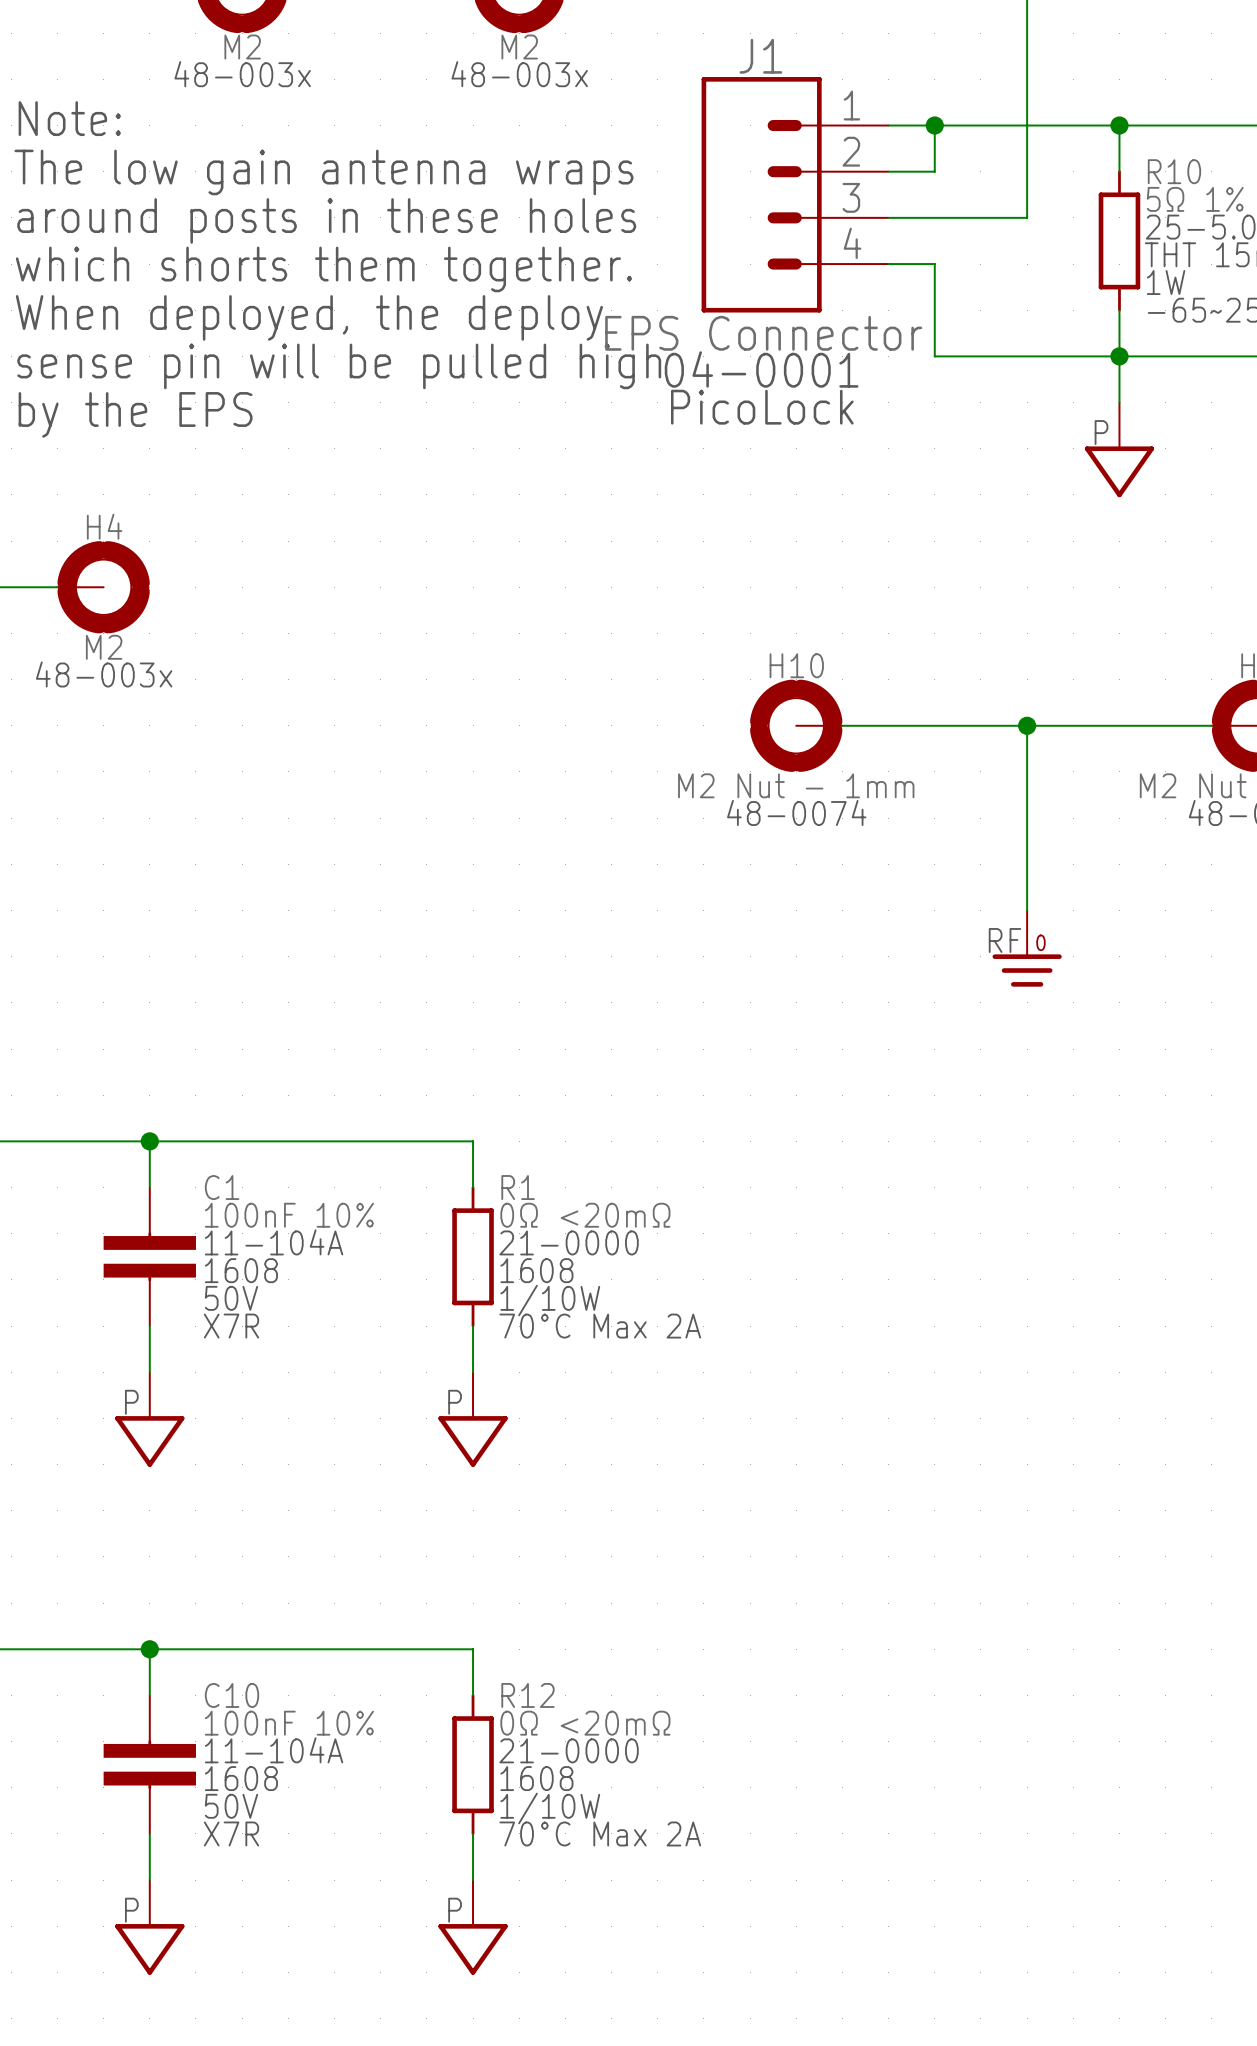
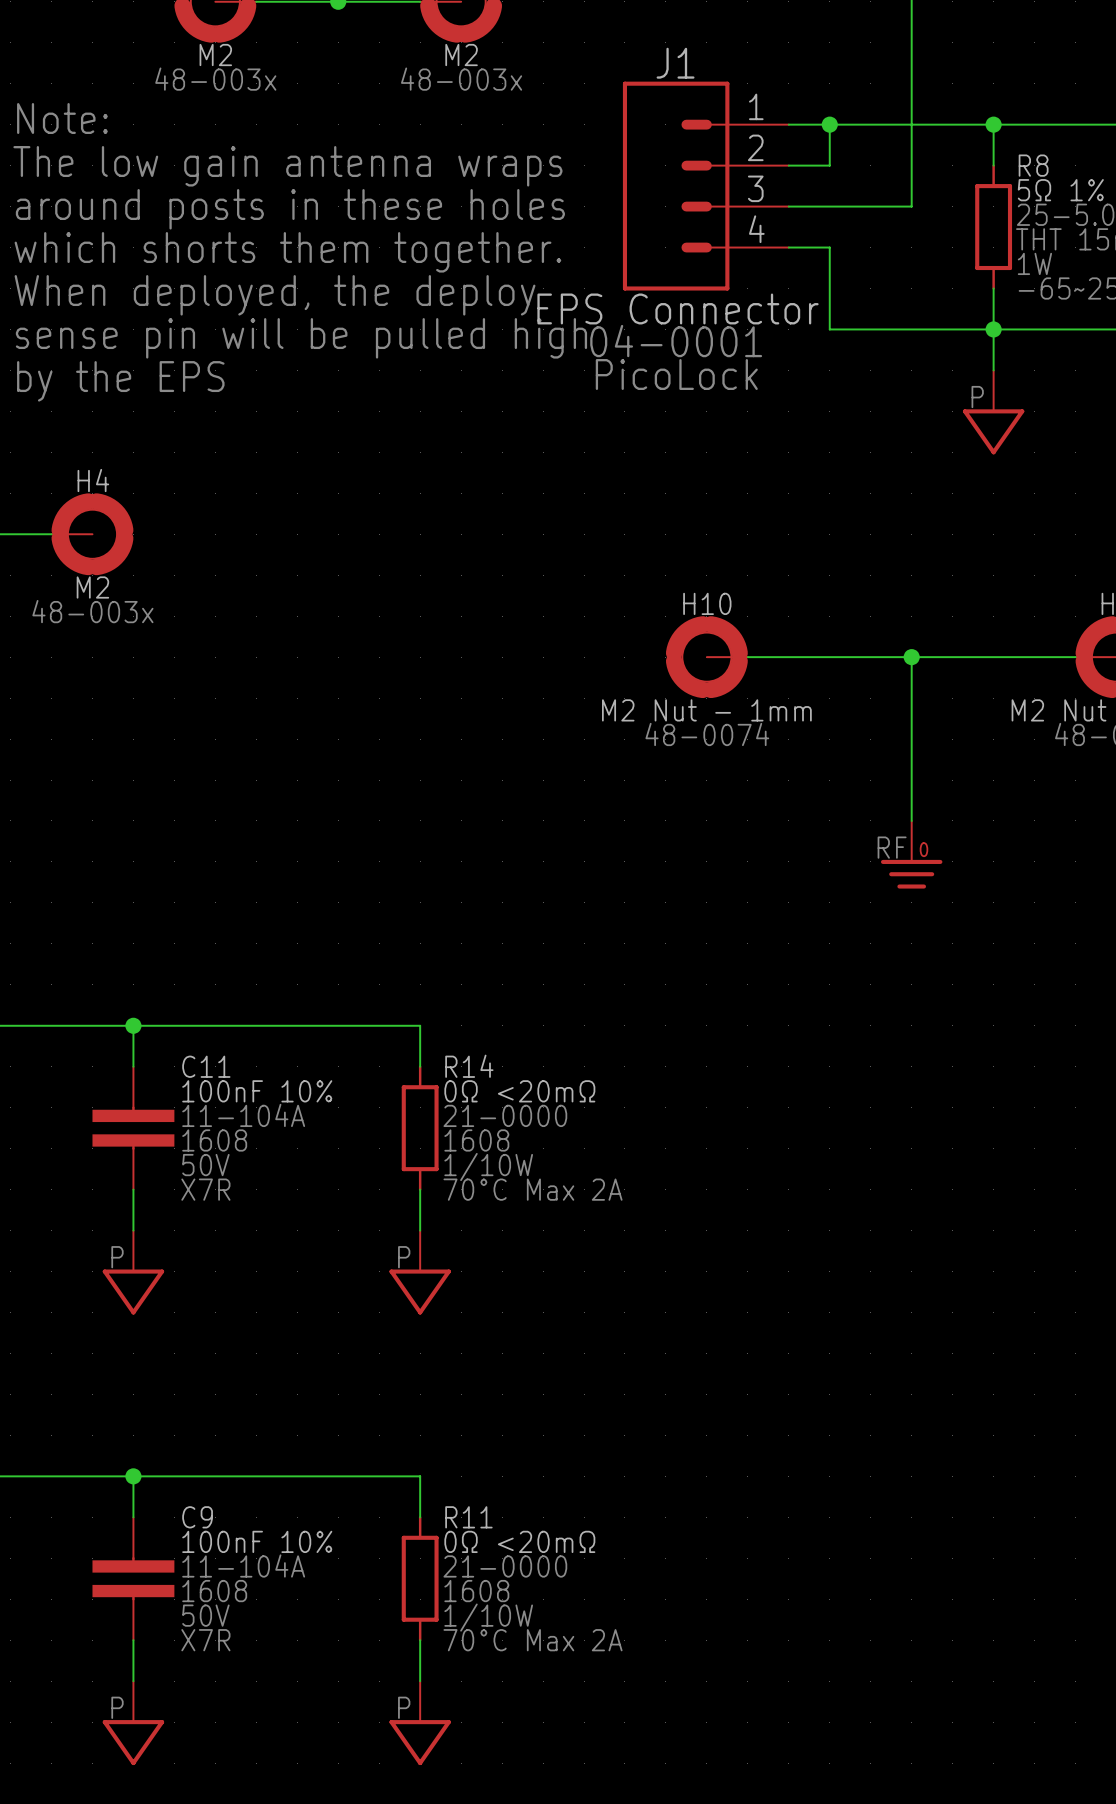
R10 name: R10 (1174, 171) -> R8 (1033, 165)
C1 name: C1 (222, 1187) -> C11 (206, 1066)
R1 name: R1 (518, 1187) -> R14 (469, 1066)
C10 name: C10 (231, 1695) -> C9 (197, 1517)
R12 name: R12 (528, 1695) -> R11 (468, 1517)

